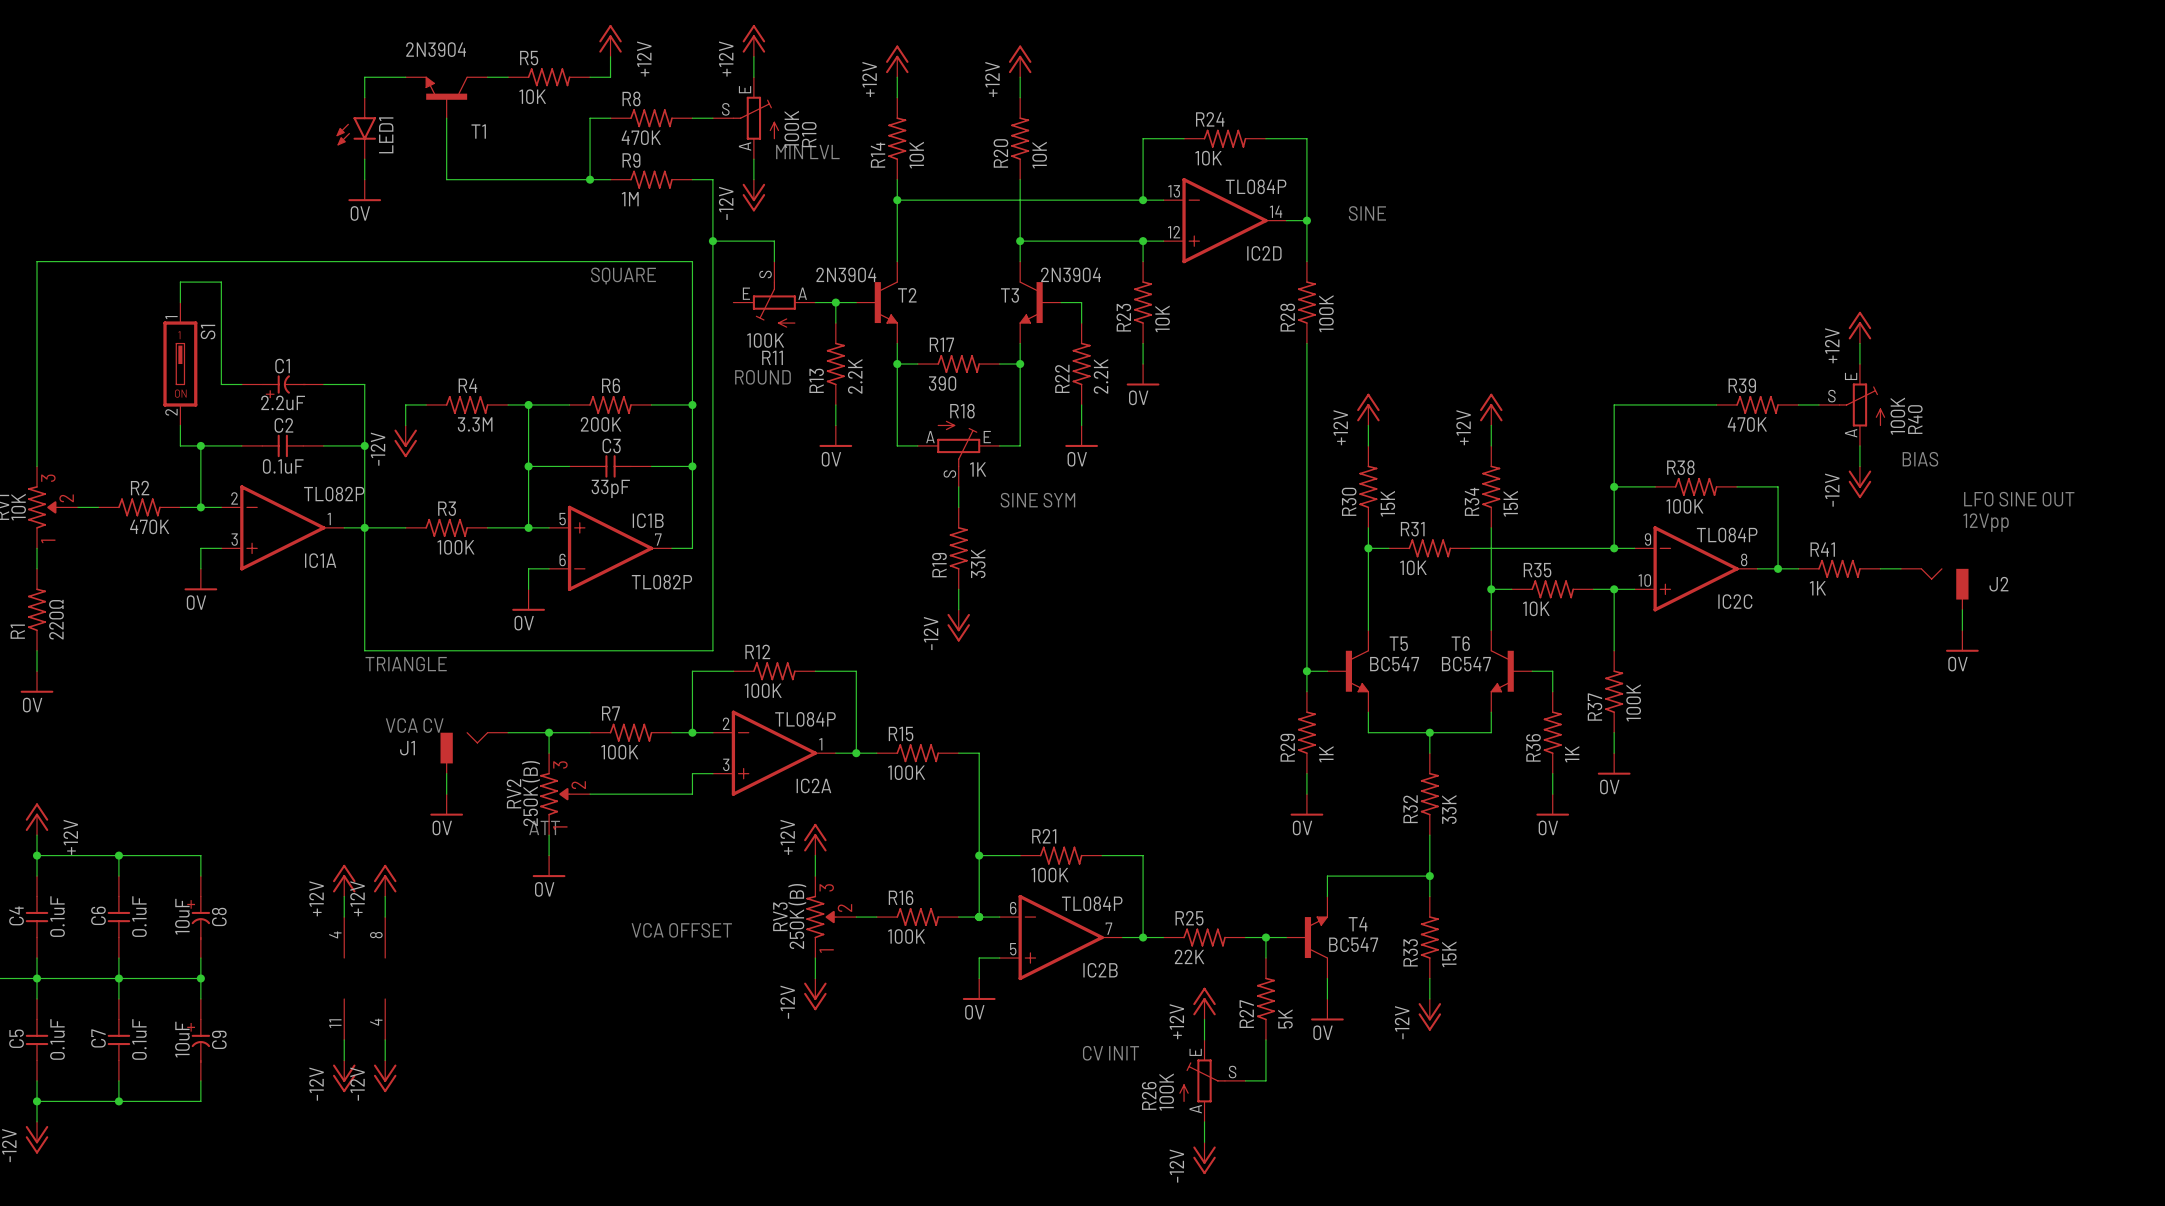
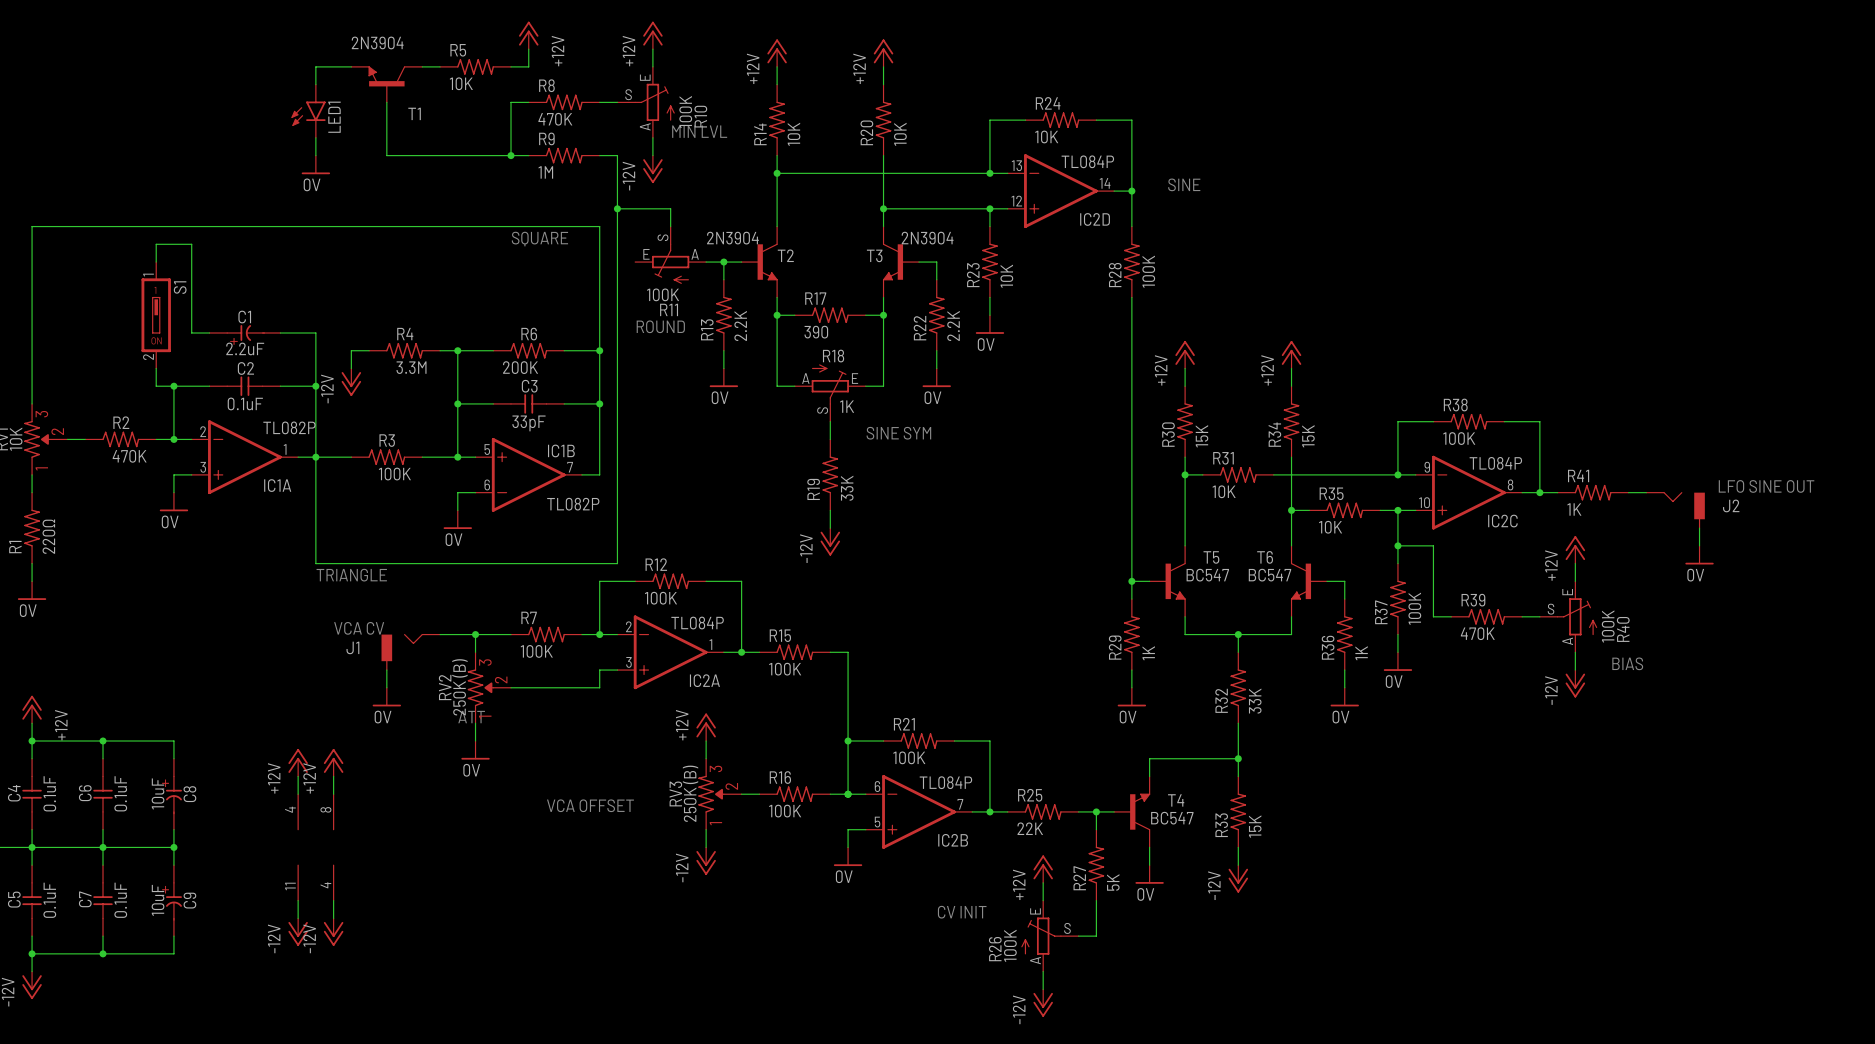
power symbol: +12V (1859, 327) -> none
wire: (1859, 343) (1859, 364) -> none
wire: (1716, 404) (1614, 404) (1614, 486) -> none
R39 position: (1757, 404) -> (1486, 616)
wire: (1798, 404) (1818, 404) -> none
R40 position: (1852, 404) -> (1568, 616)
wire: (1859, 445) (1859, 466) -> none
text: BIAS (1920, 459) -> none
power symbol: -12V (1859, 482) -> none
junction: (1614, 486) -> none
text position: LFO SINE OUT (2019, 499) -> LFO SINE OUT (1766, 486)
text: 12Vpp (1986, 522) -> none
wire: none -> (1397, 545) (1433, 545) (1433, 616) (1451, 616)
junction: none -> (1397, 545)
power symbol: none -> +12V (1575, 549)
wire: none -> (1575, 563) (1575, 581)
wire: none -> (1522, 616) (1539, 616)
wire: none -> (1575, 652) (1575, 670)
text: none -> BIAS (1627, 663)
power symbol: none -> -12V (1575, 683)

